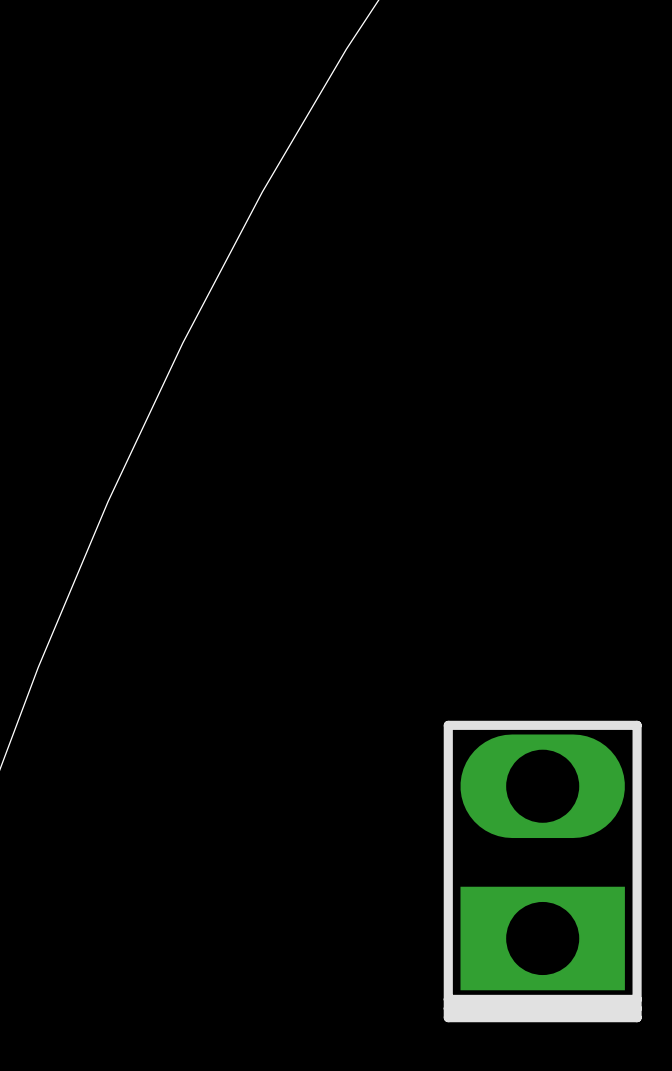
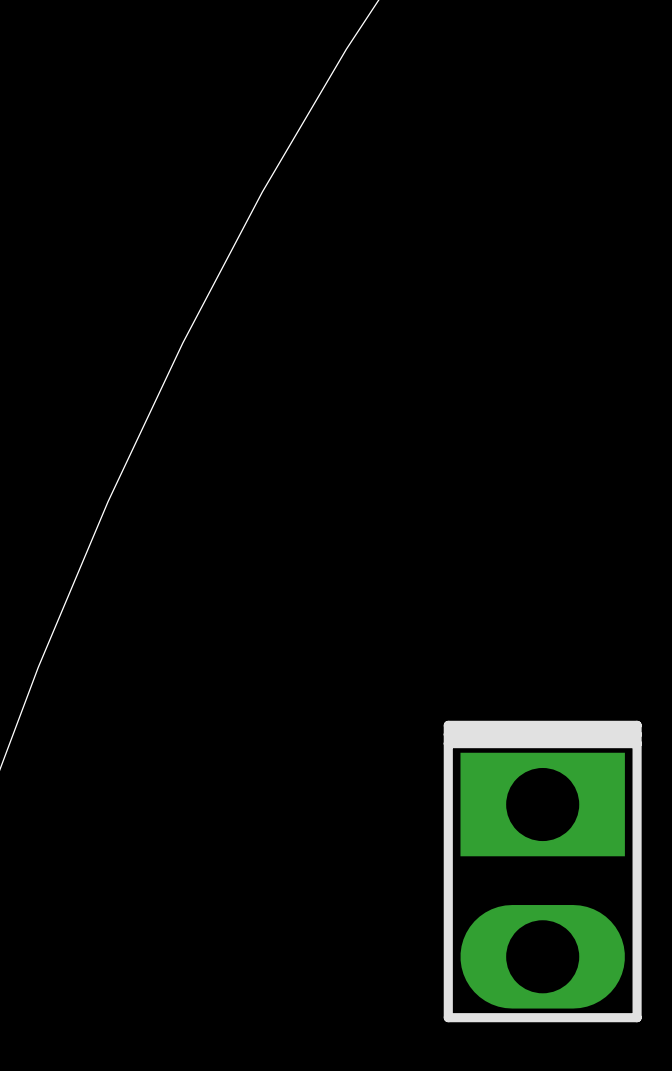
part rotation: 0° (542, 871) -> 180° (542, 871)

